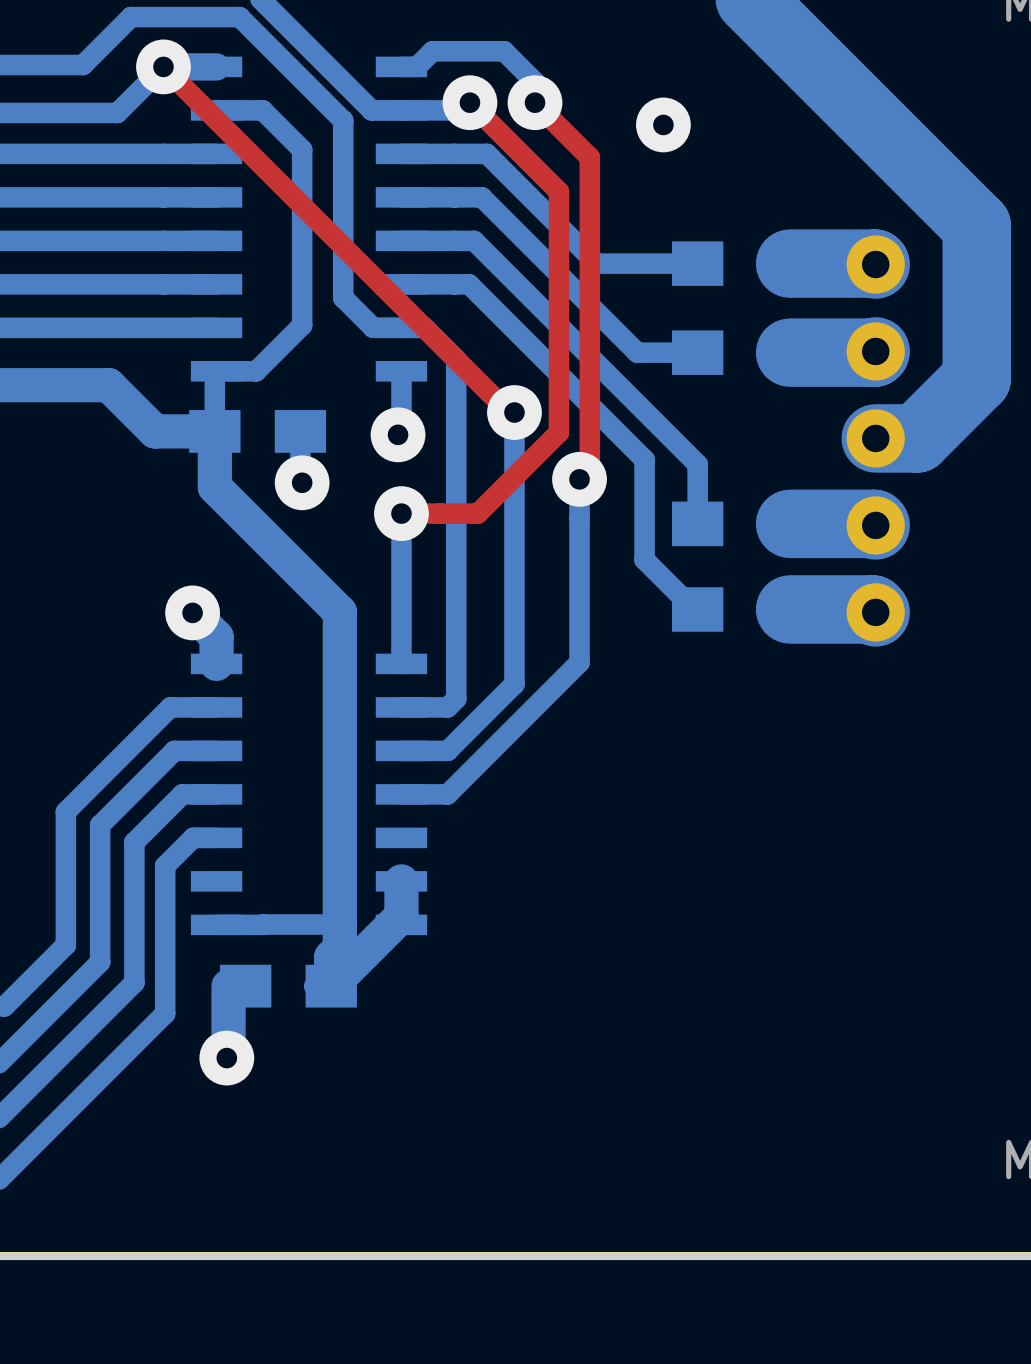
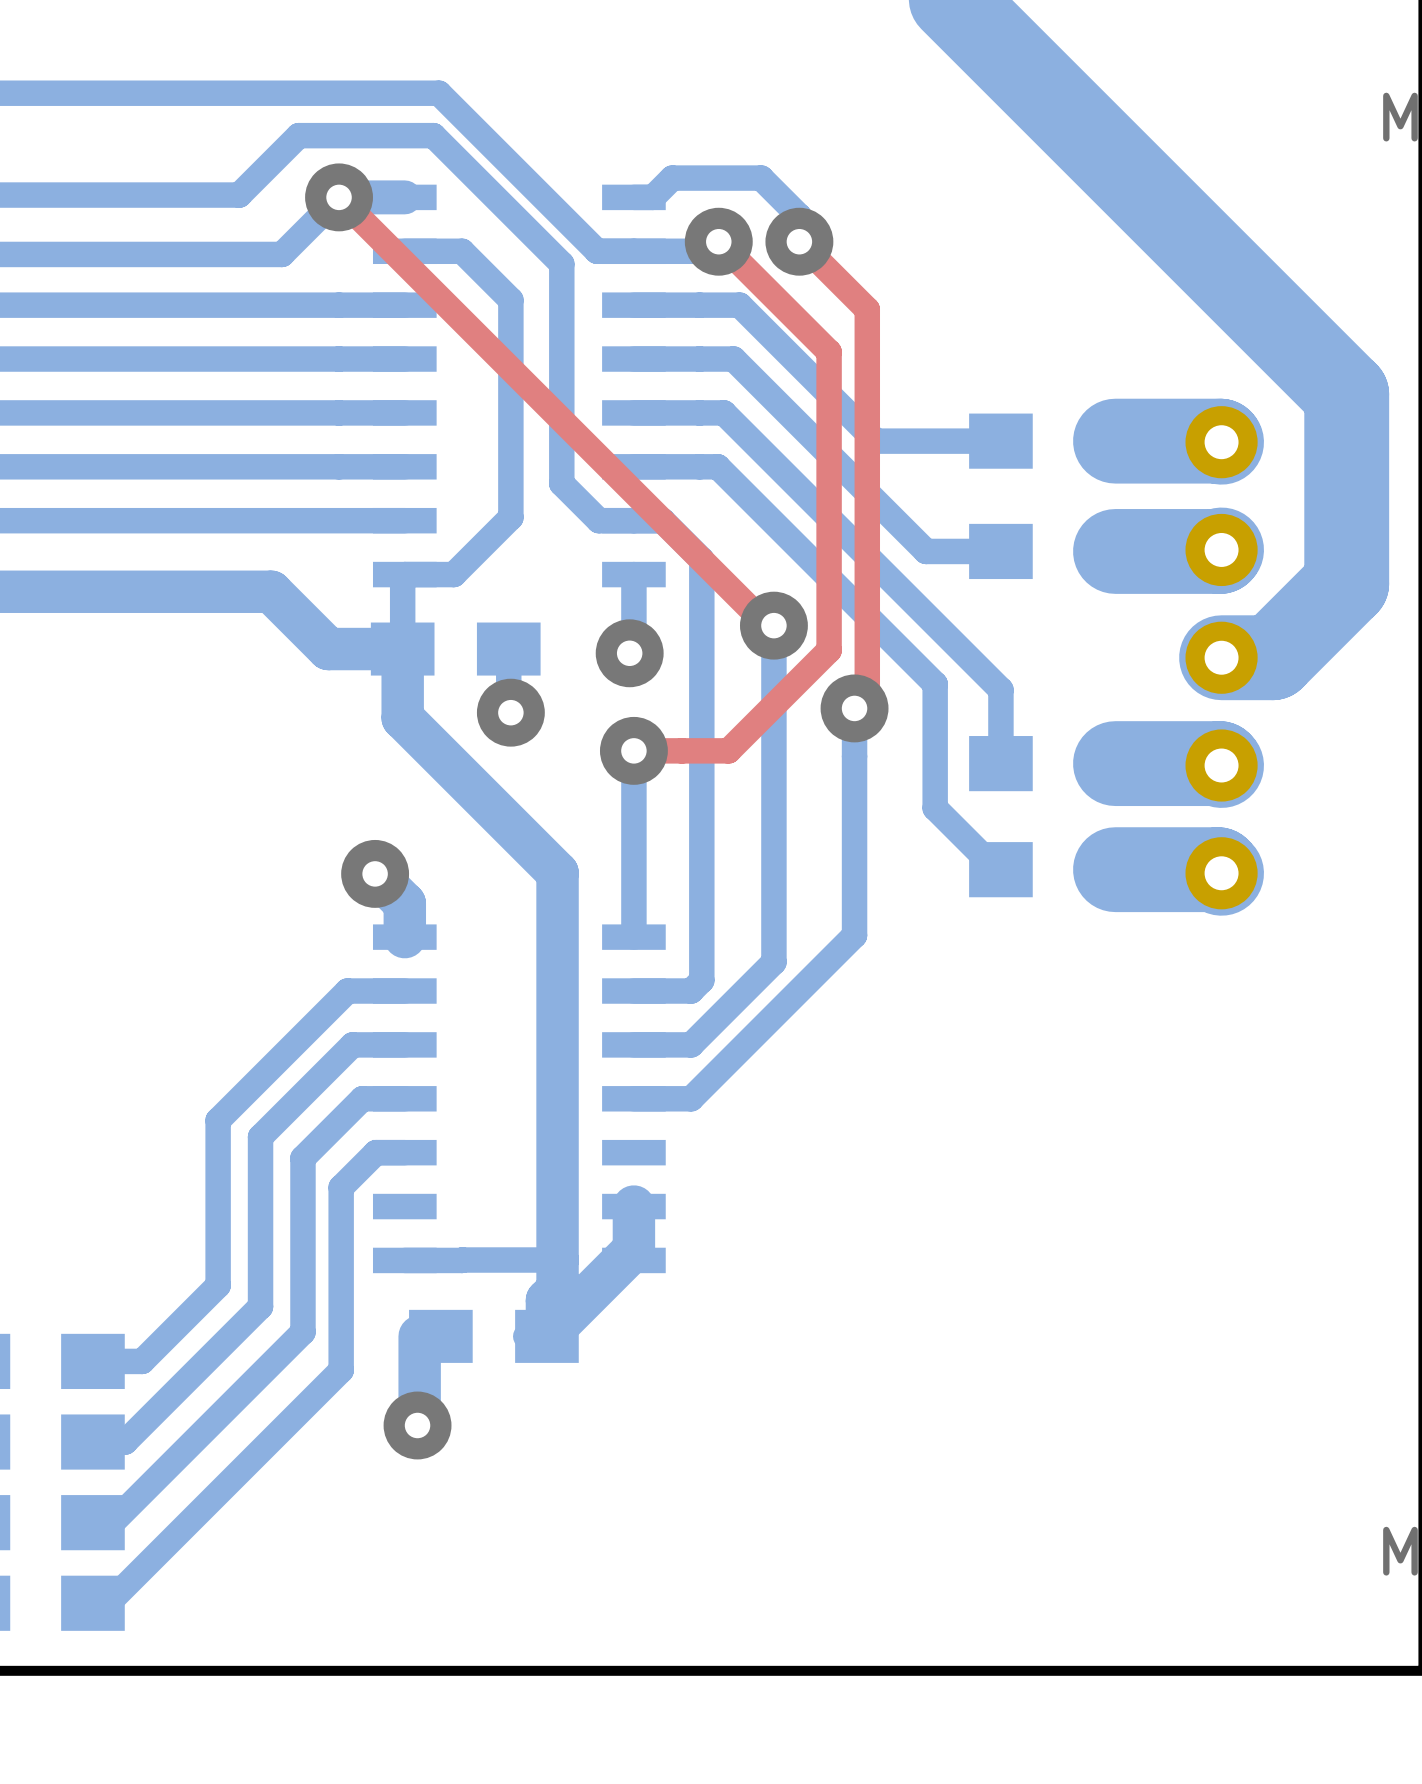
via: (663, 124) -> none

